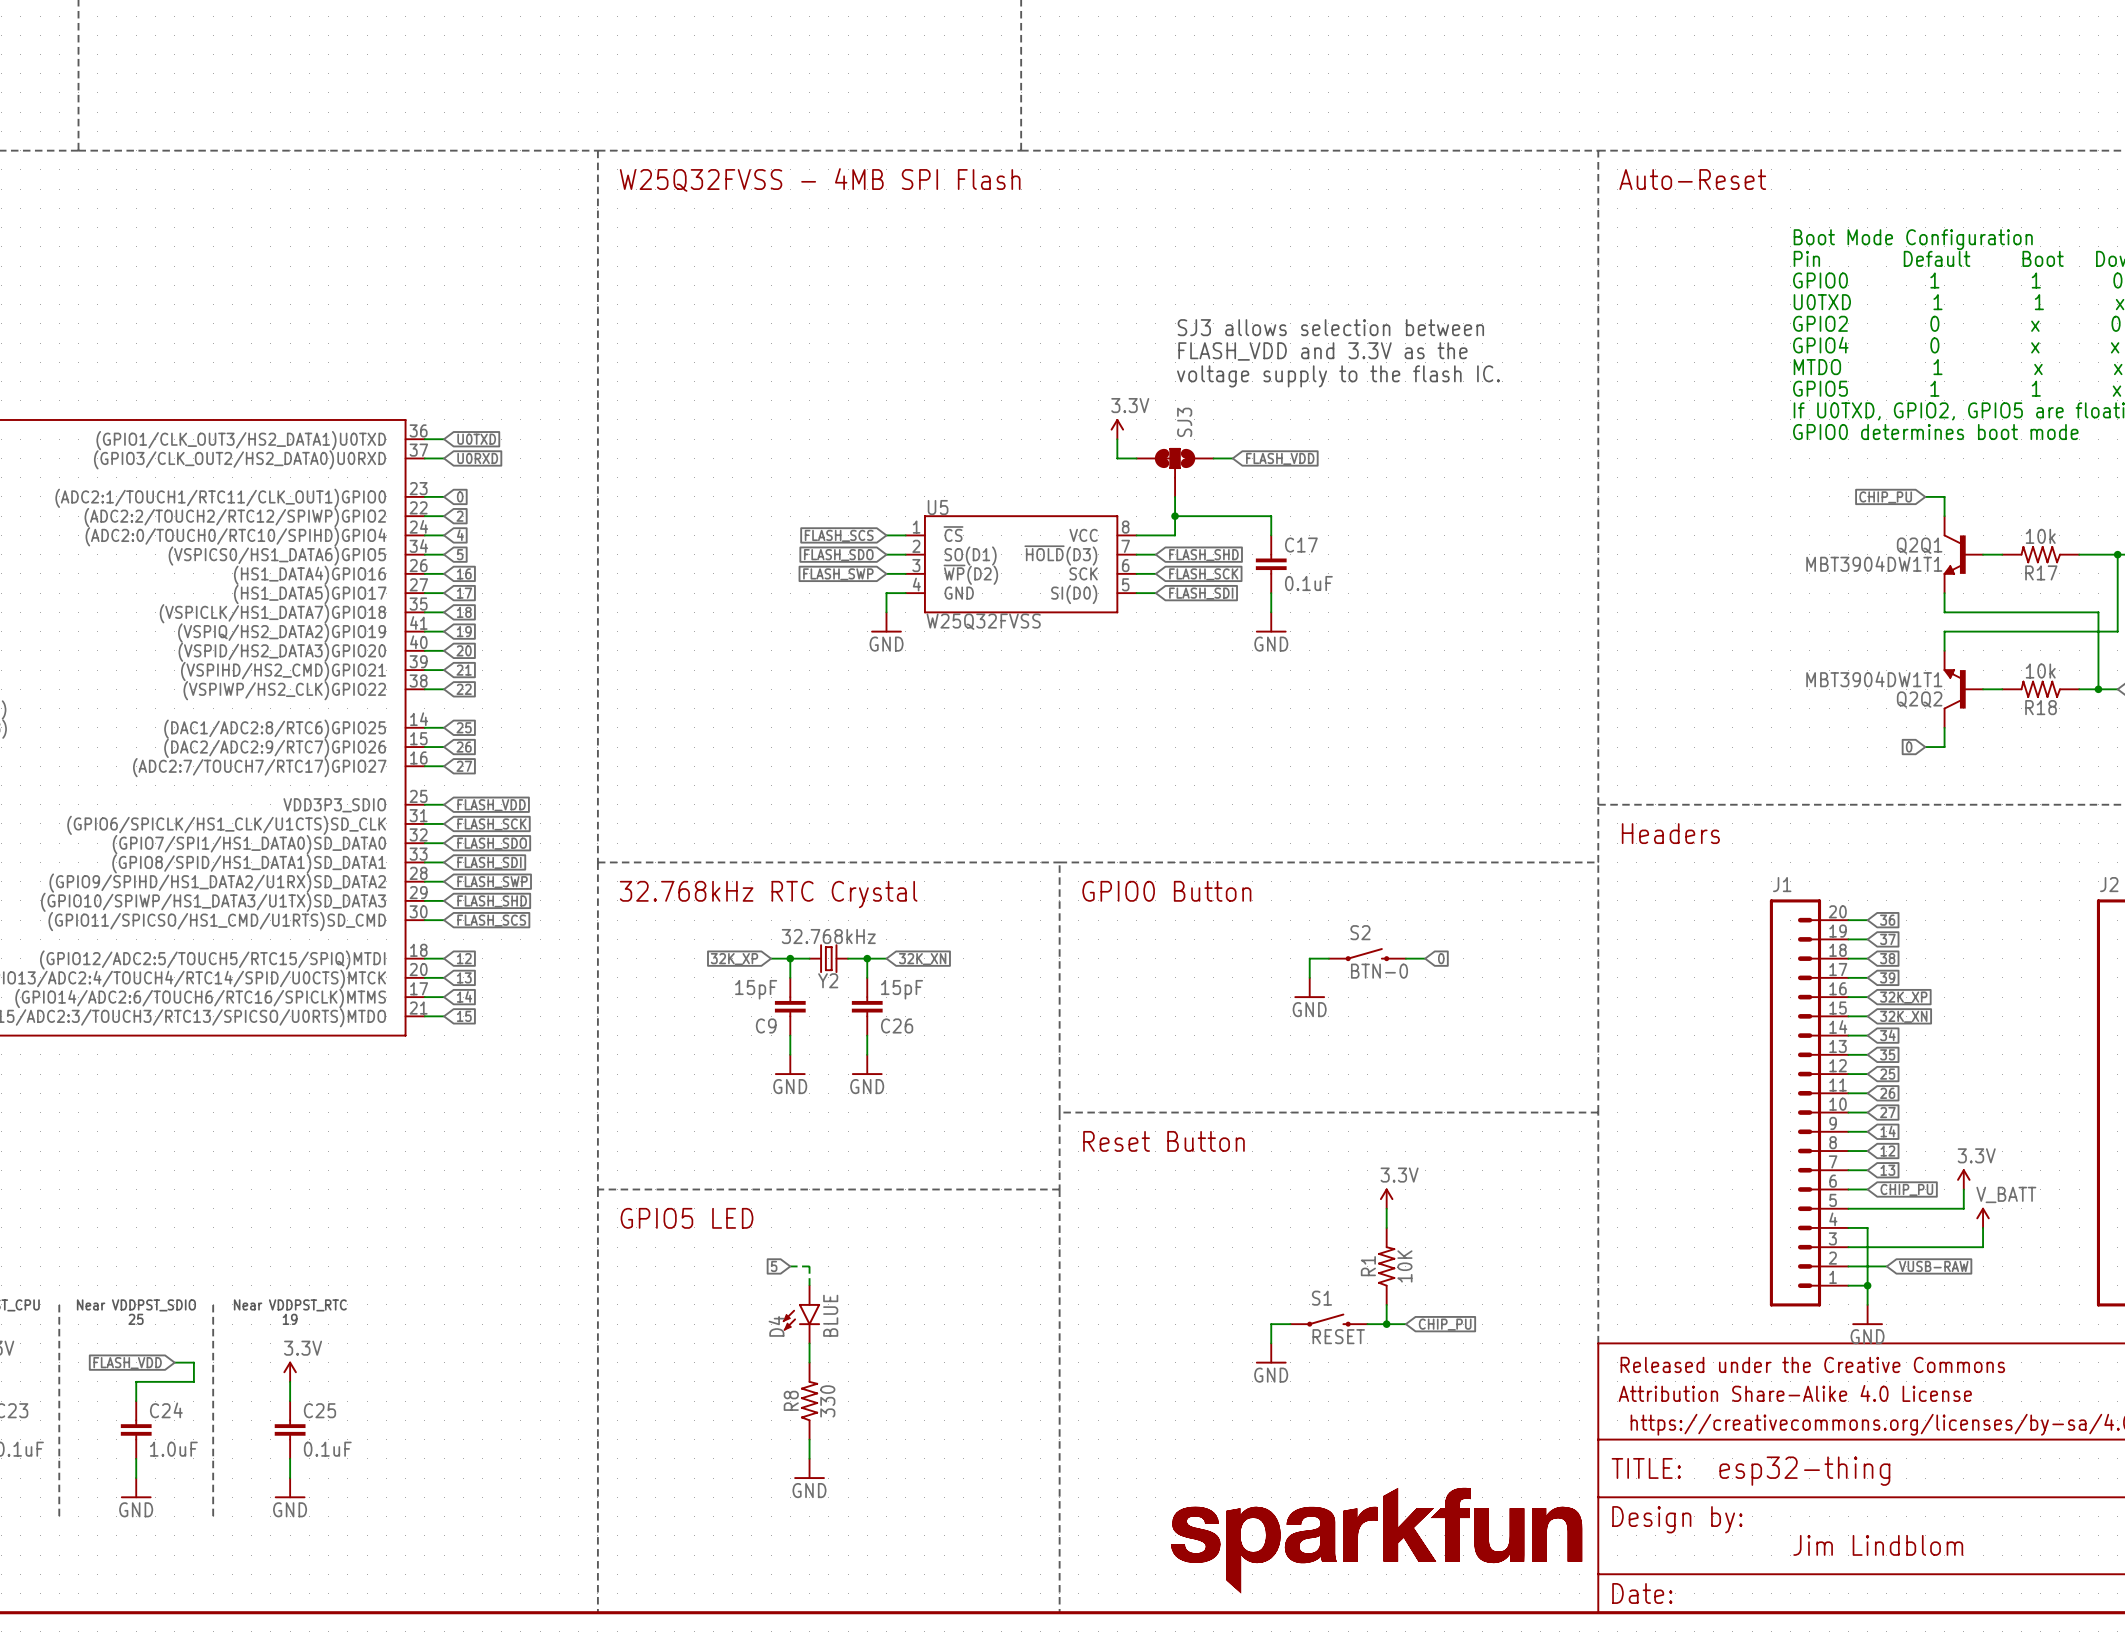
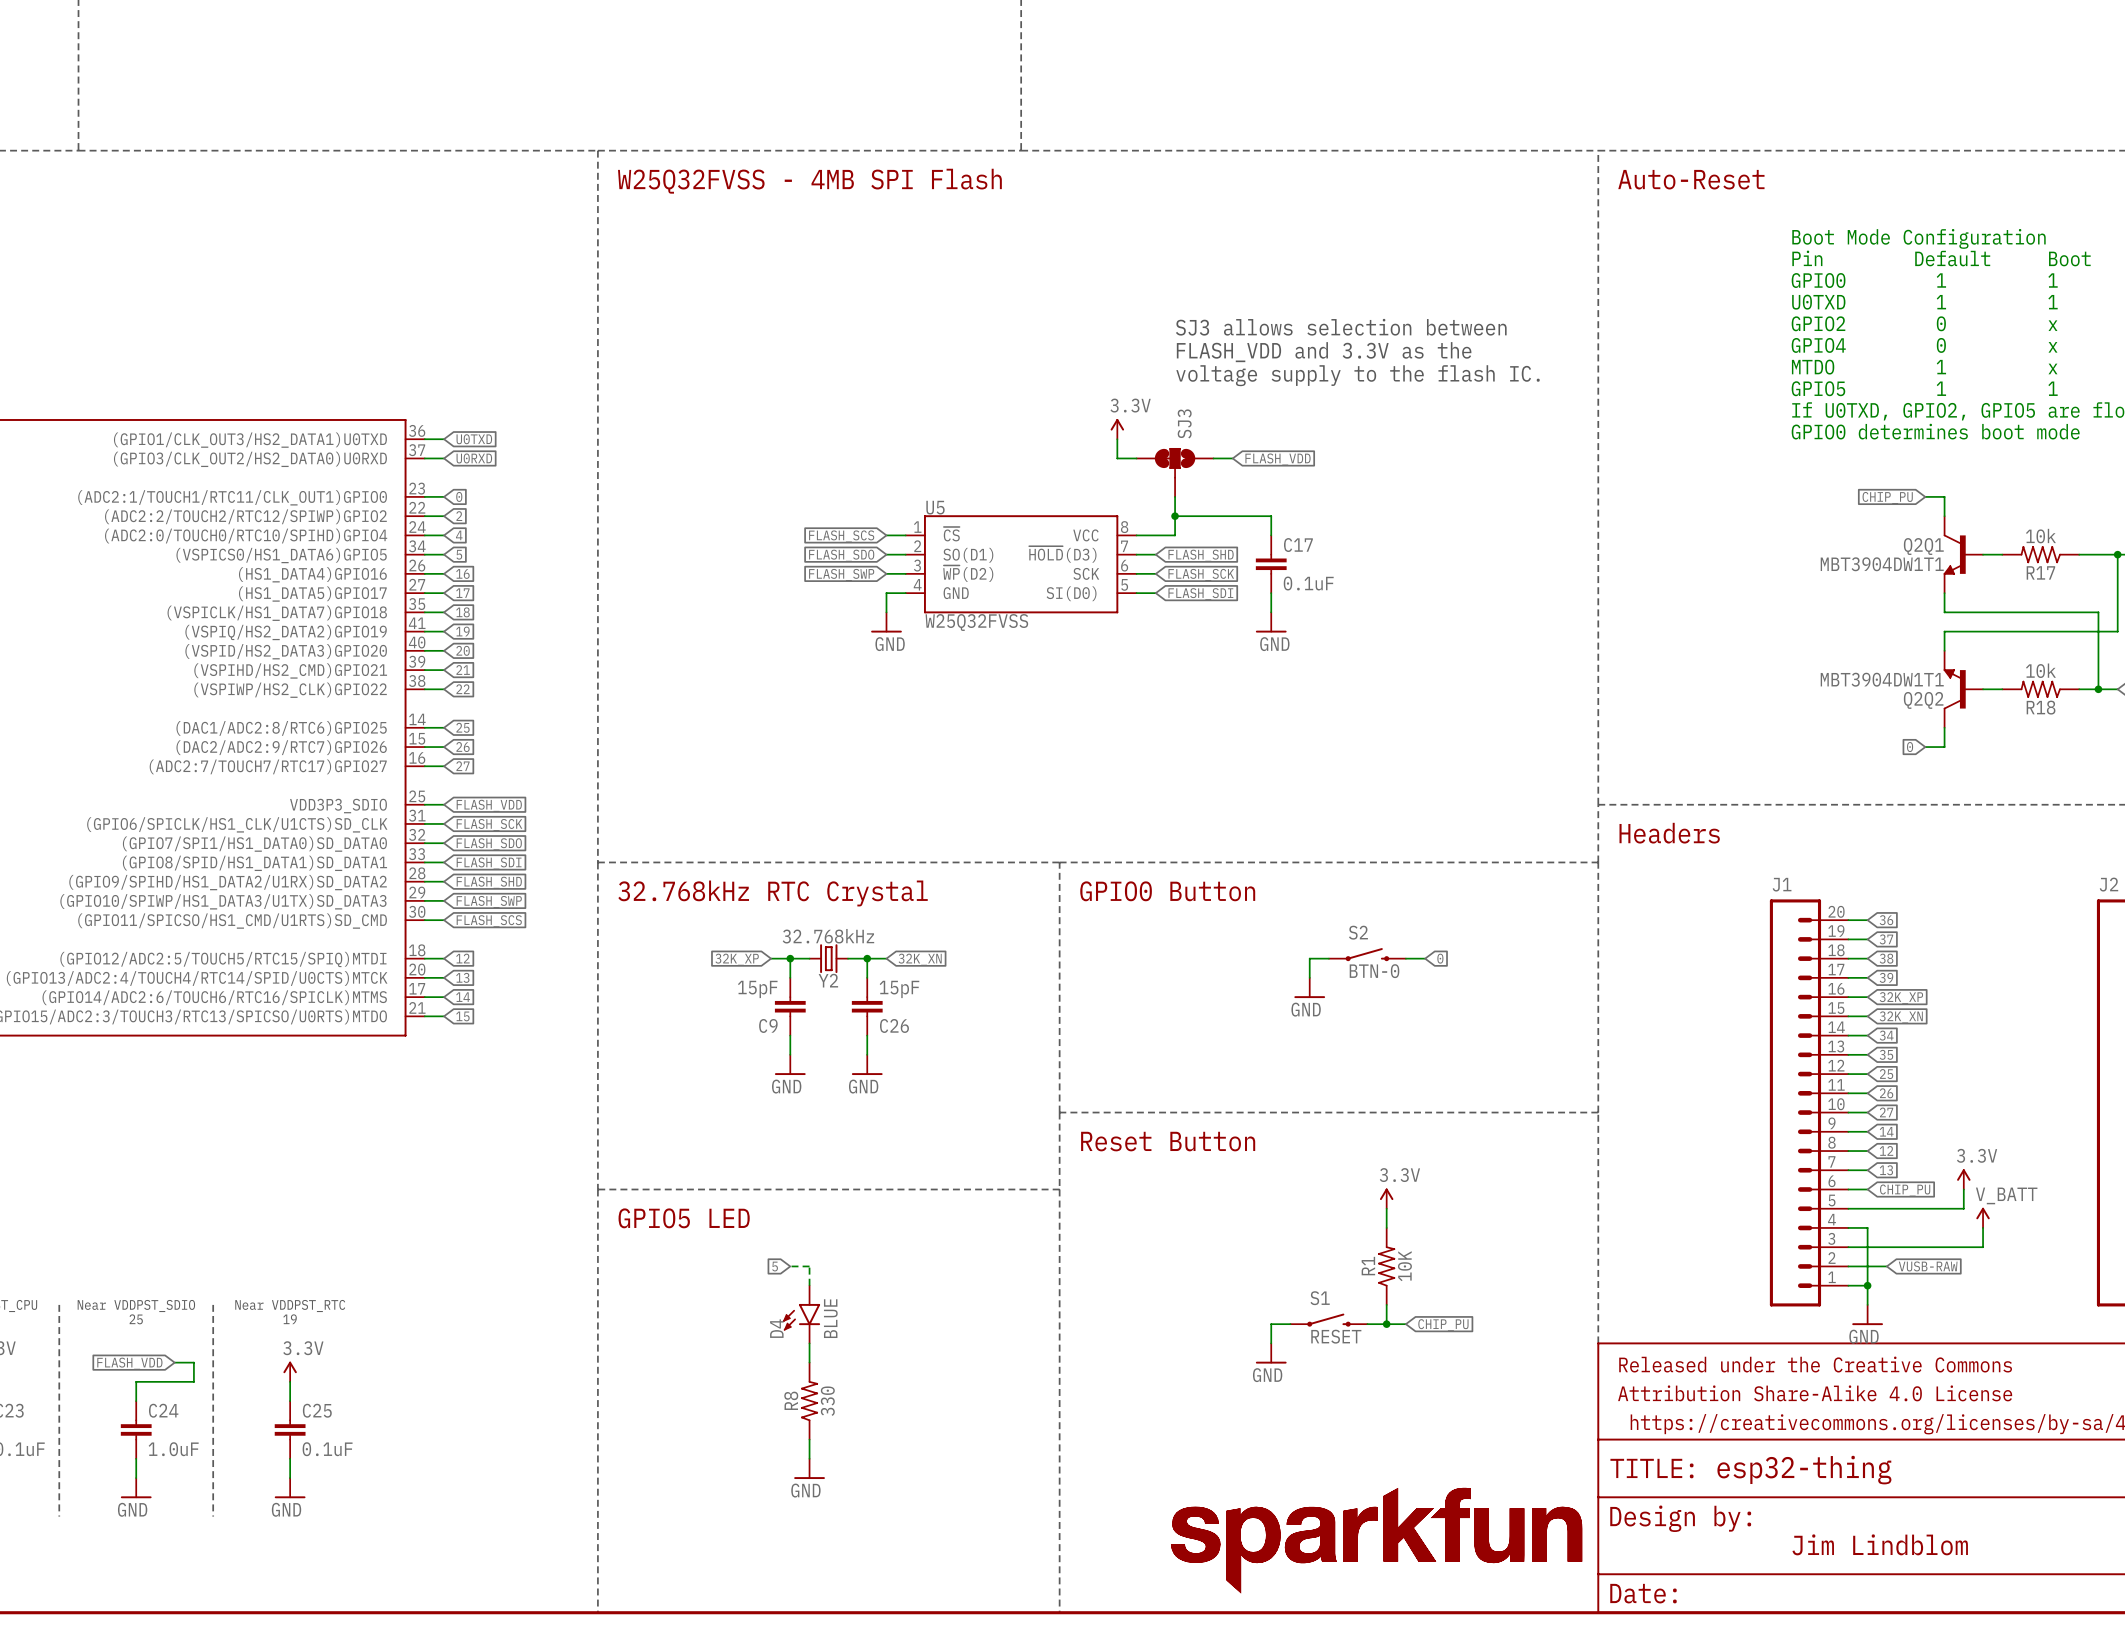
global label: FLASH_SWP (492, 882) -> FLASH_SHD (489, 882)
global label: FLASH_SHD (492, 901) -> FLASH_SWP (489, 902)

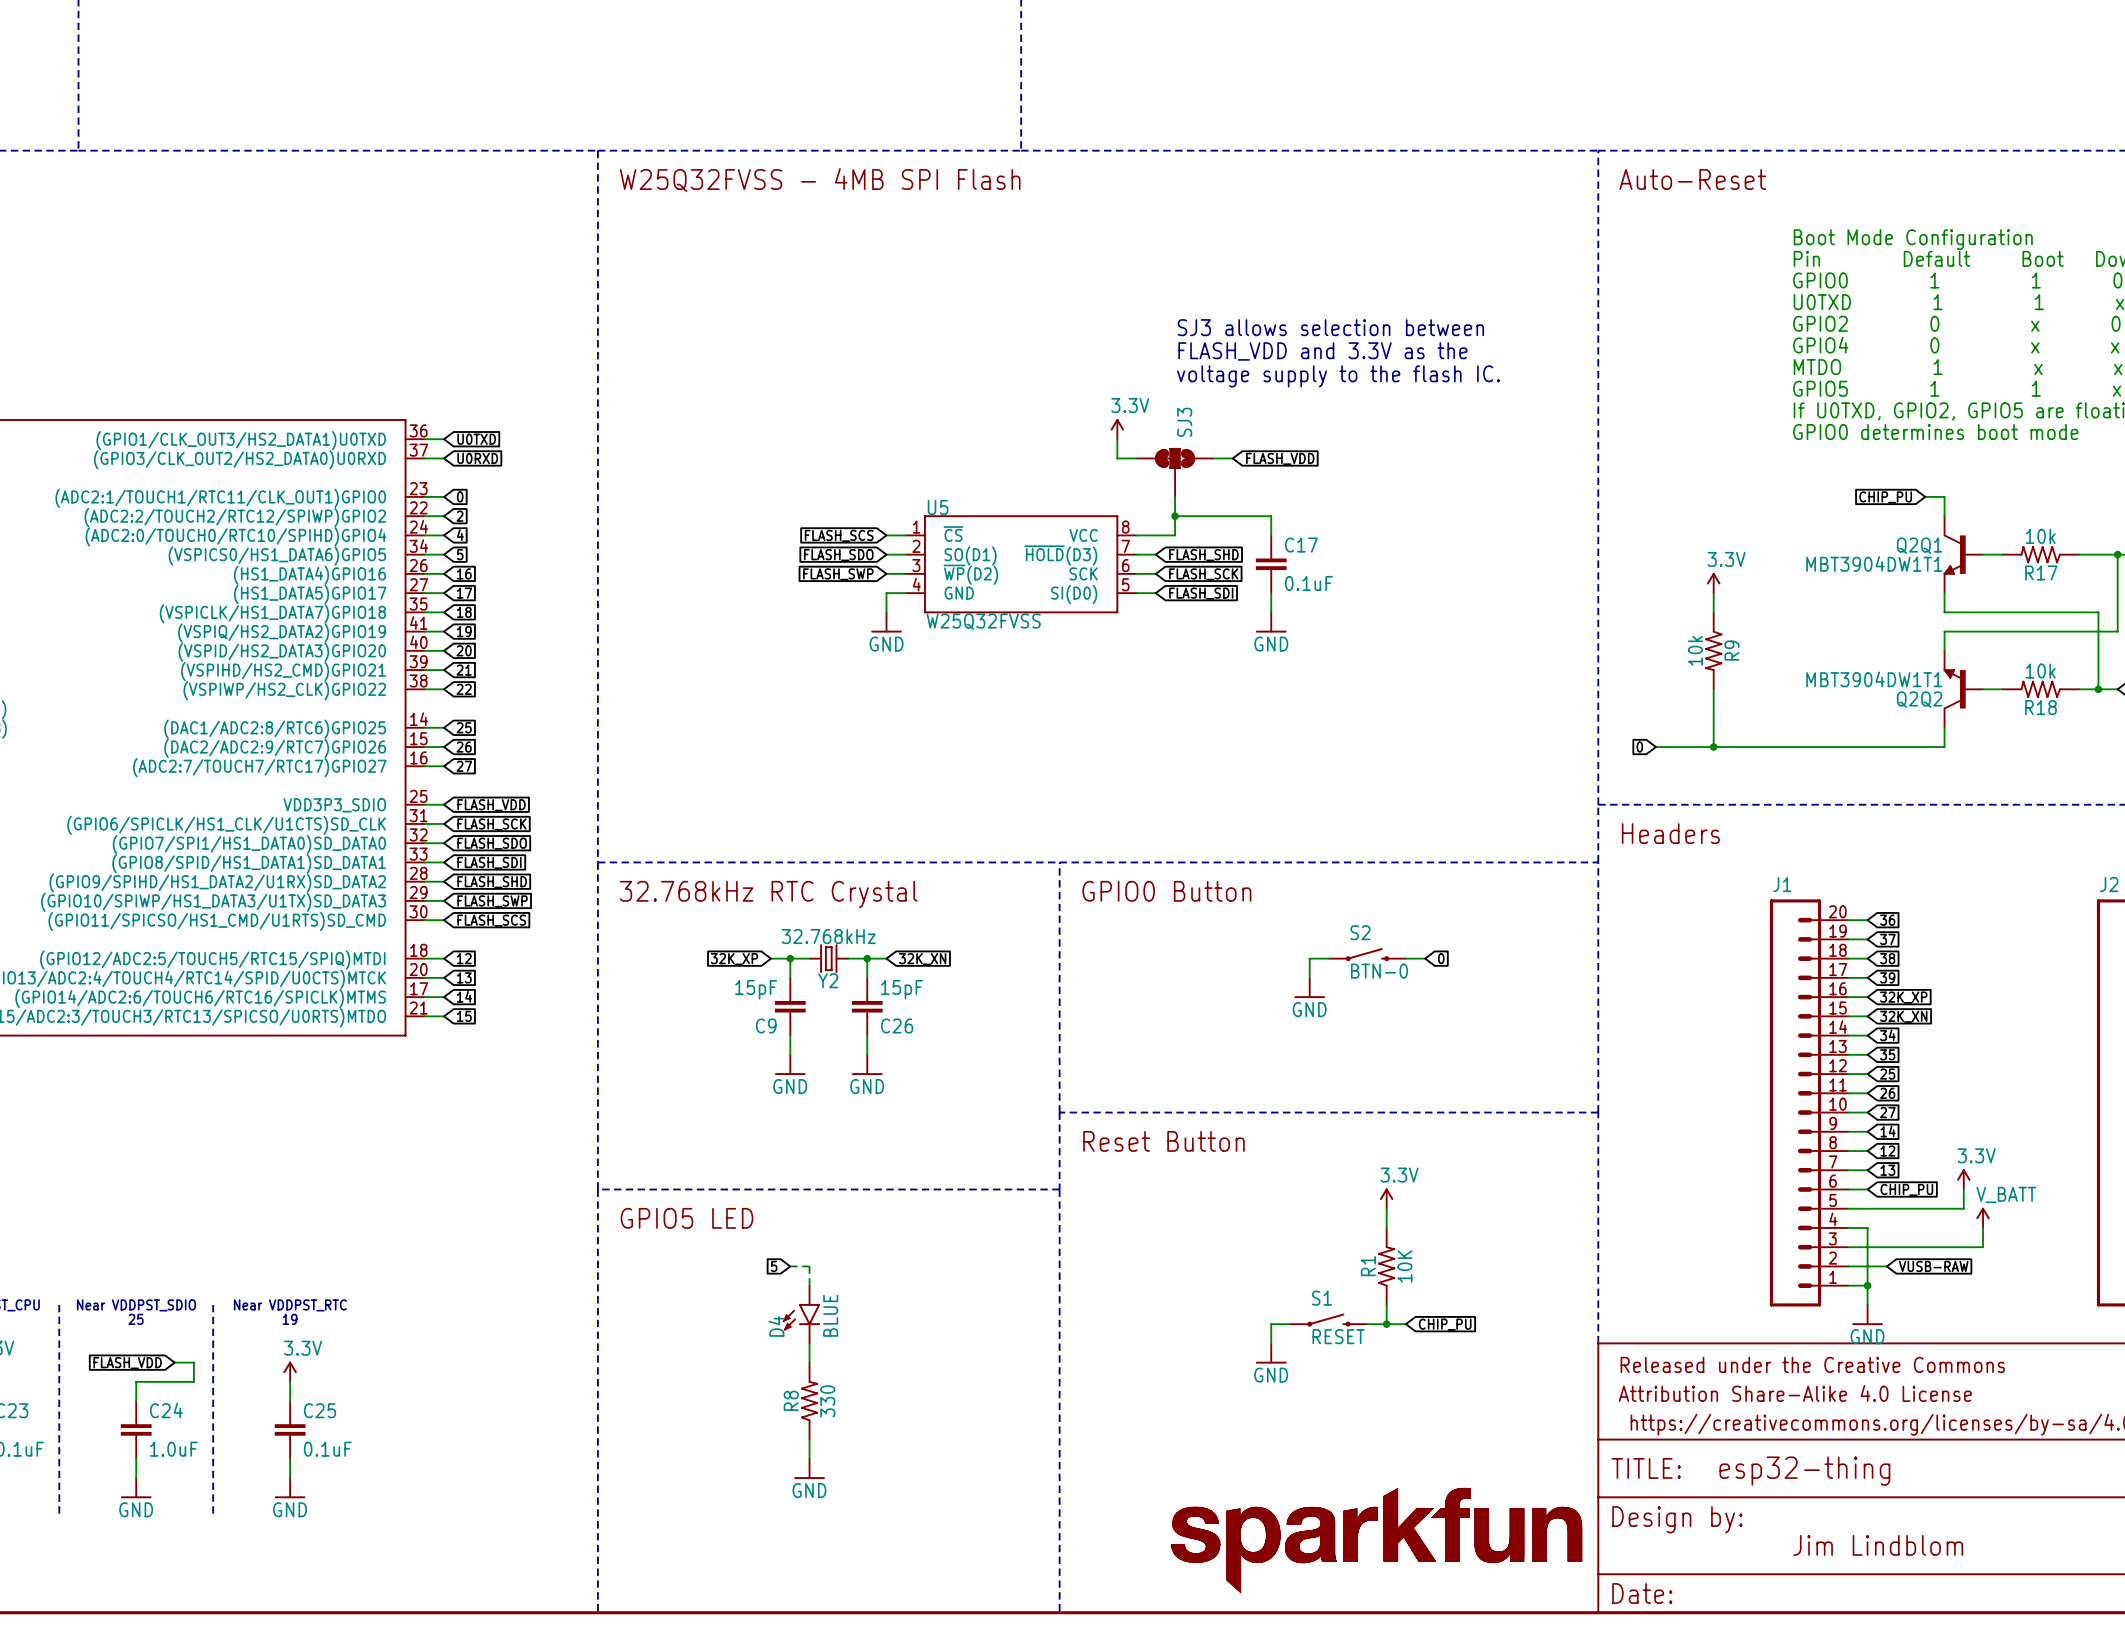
power symbol: none -> 3.3V (1713, 583)
wire: none -> (1713, 593) (1713, 612)
R9: none -> 10k (1713, 650)
wire: none -> (1713, 689) (1713, 747)
global label: none -> 0 (1639, 747)
wire: none -> (1655, 747) (1925, 747)
junction: none -> (1713, 747)
global label: 0 (1910, 747) -> none

